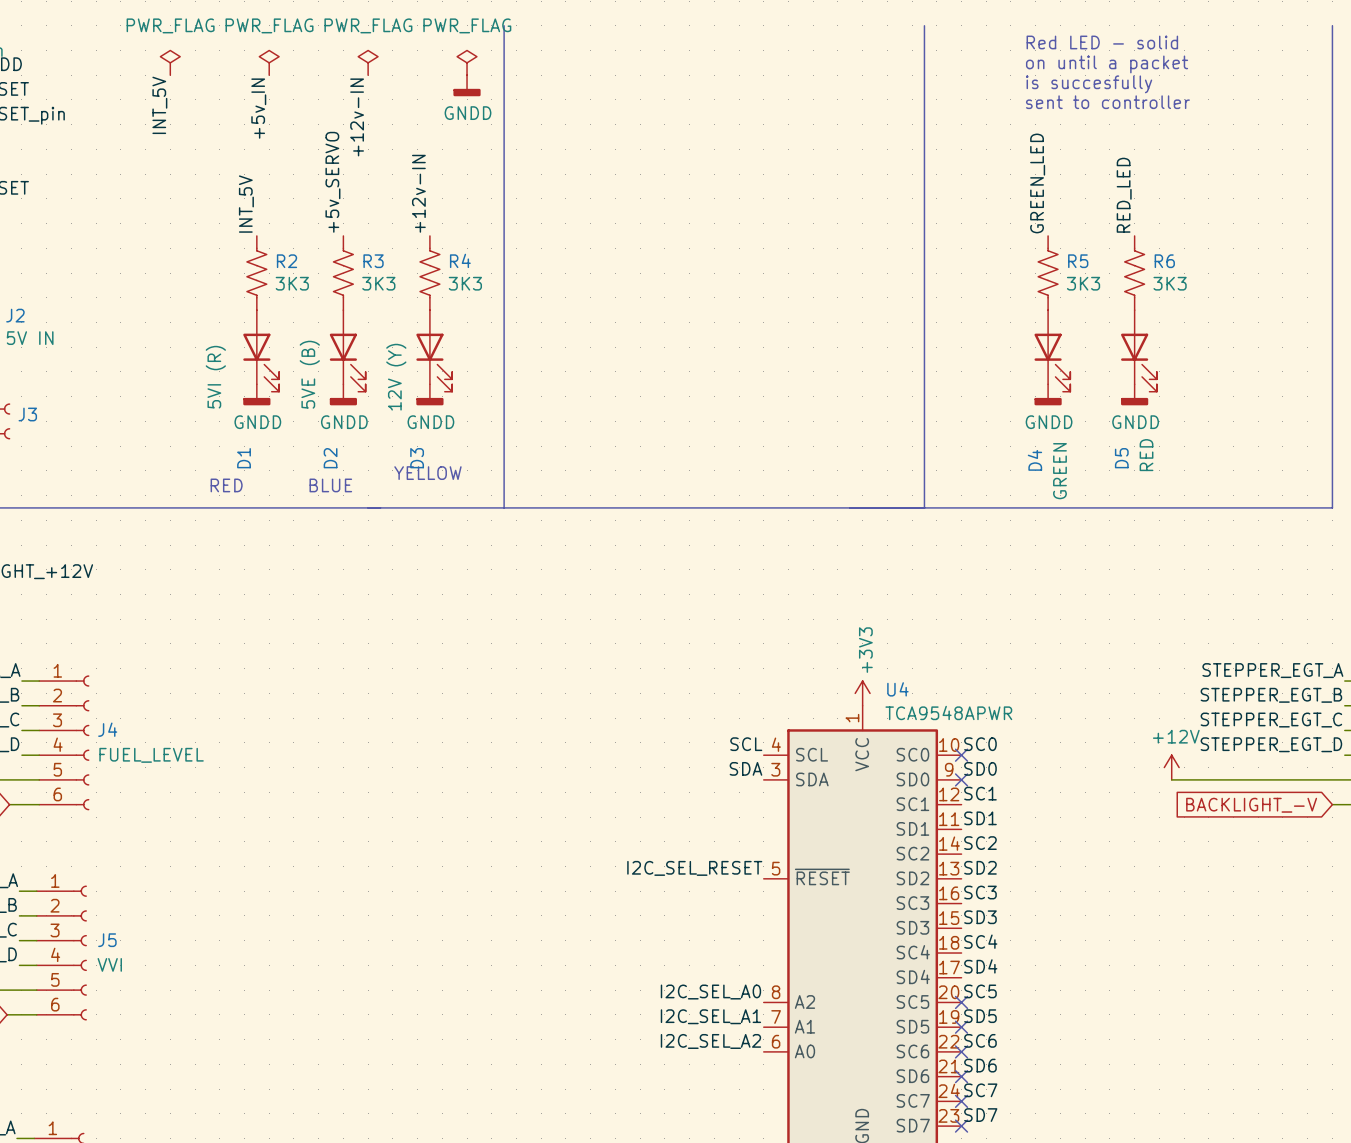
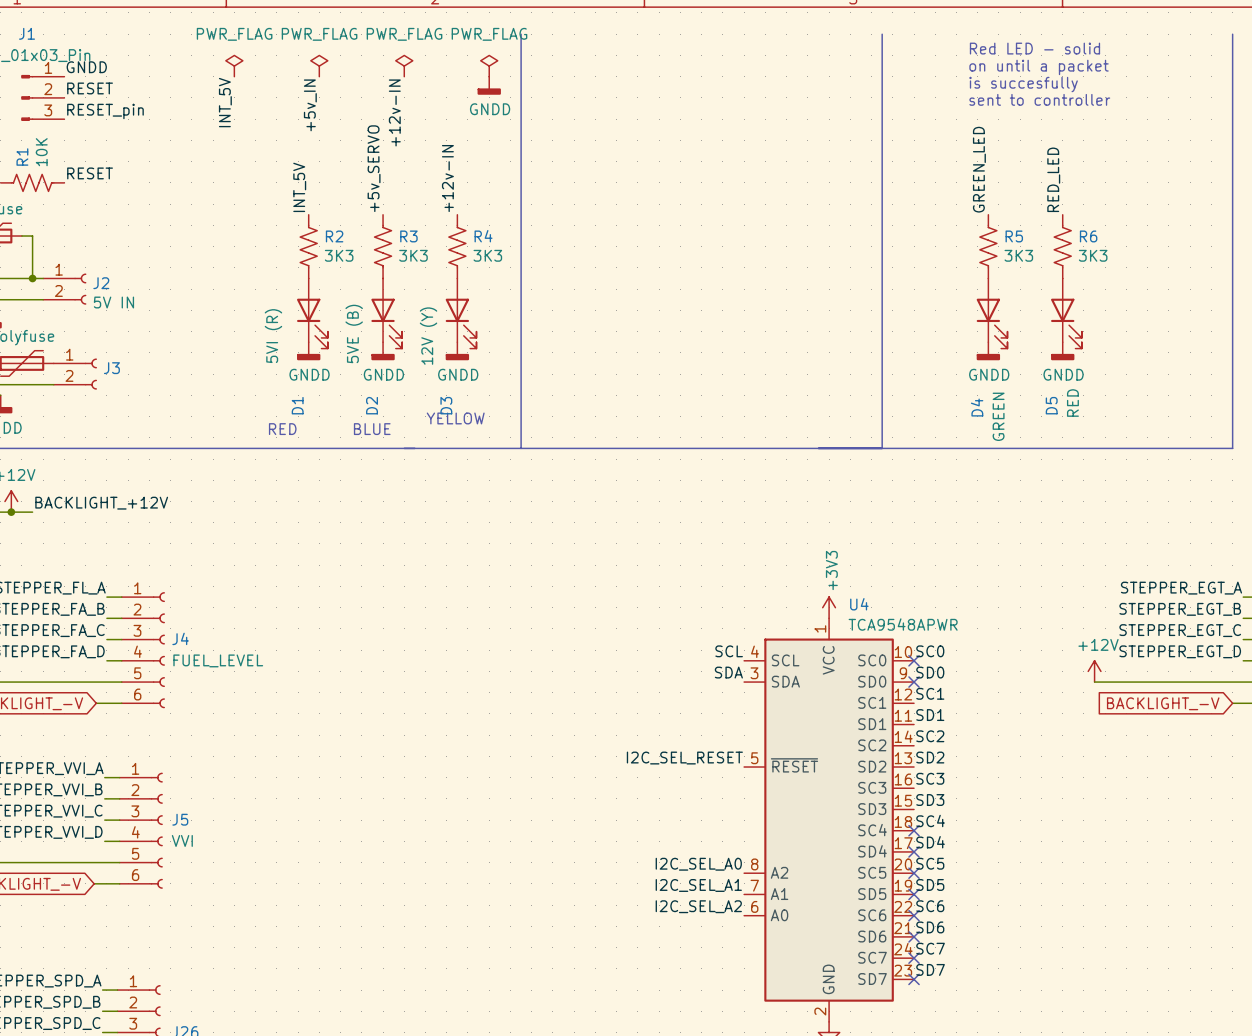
no-connect mark: none -> (914, 830)
no-connect mark: none -> (914, 851)

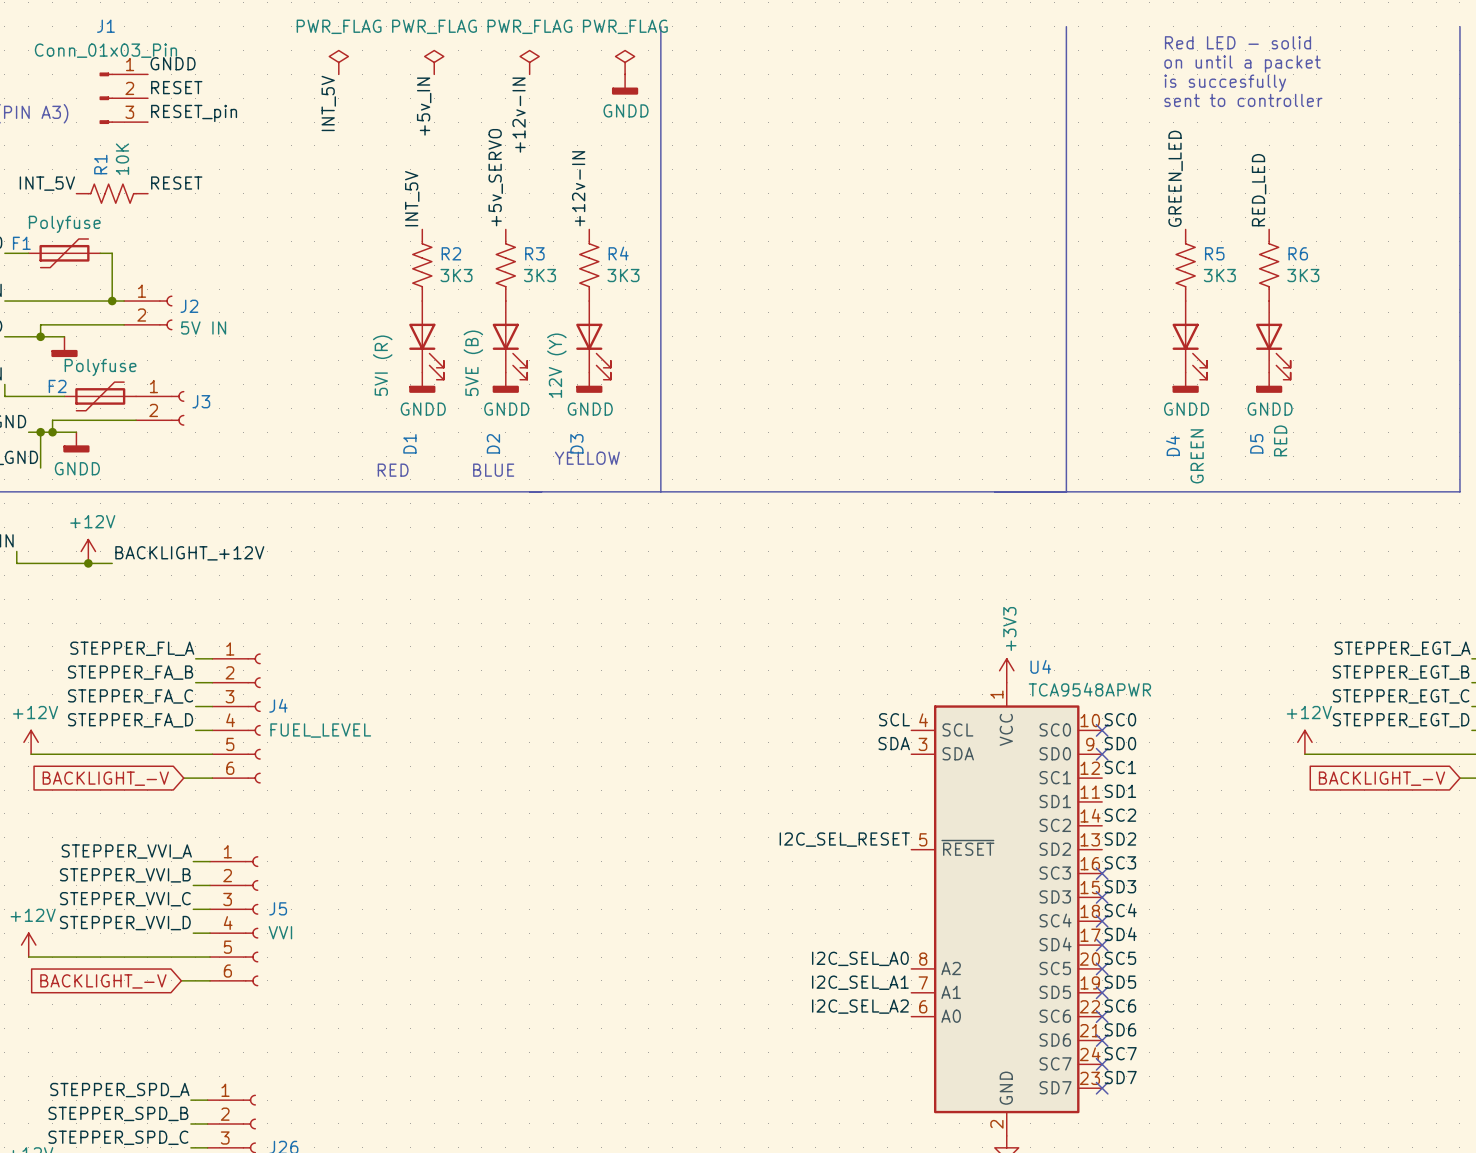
no-connect mark: none -> (1102, 873)
no-connect mark: none -> (1102, 897)

